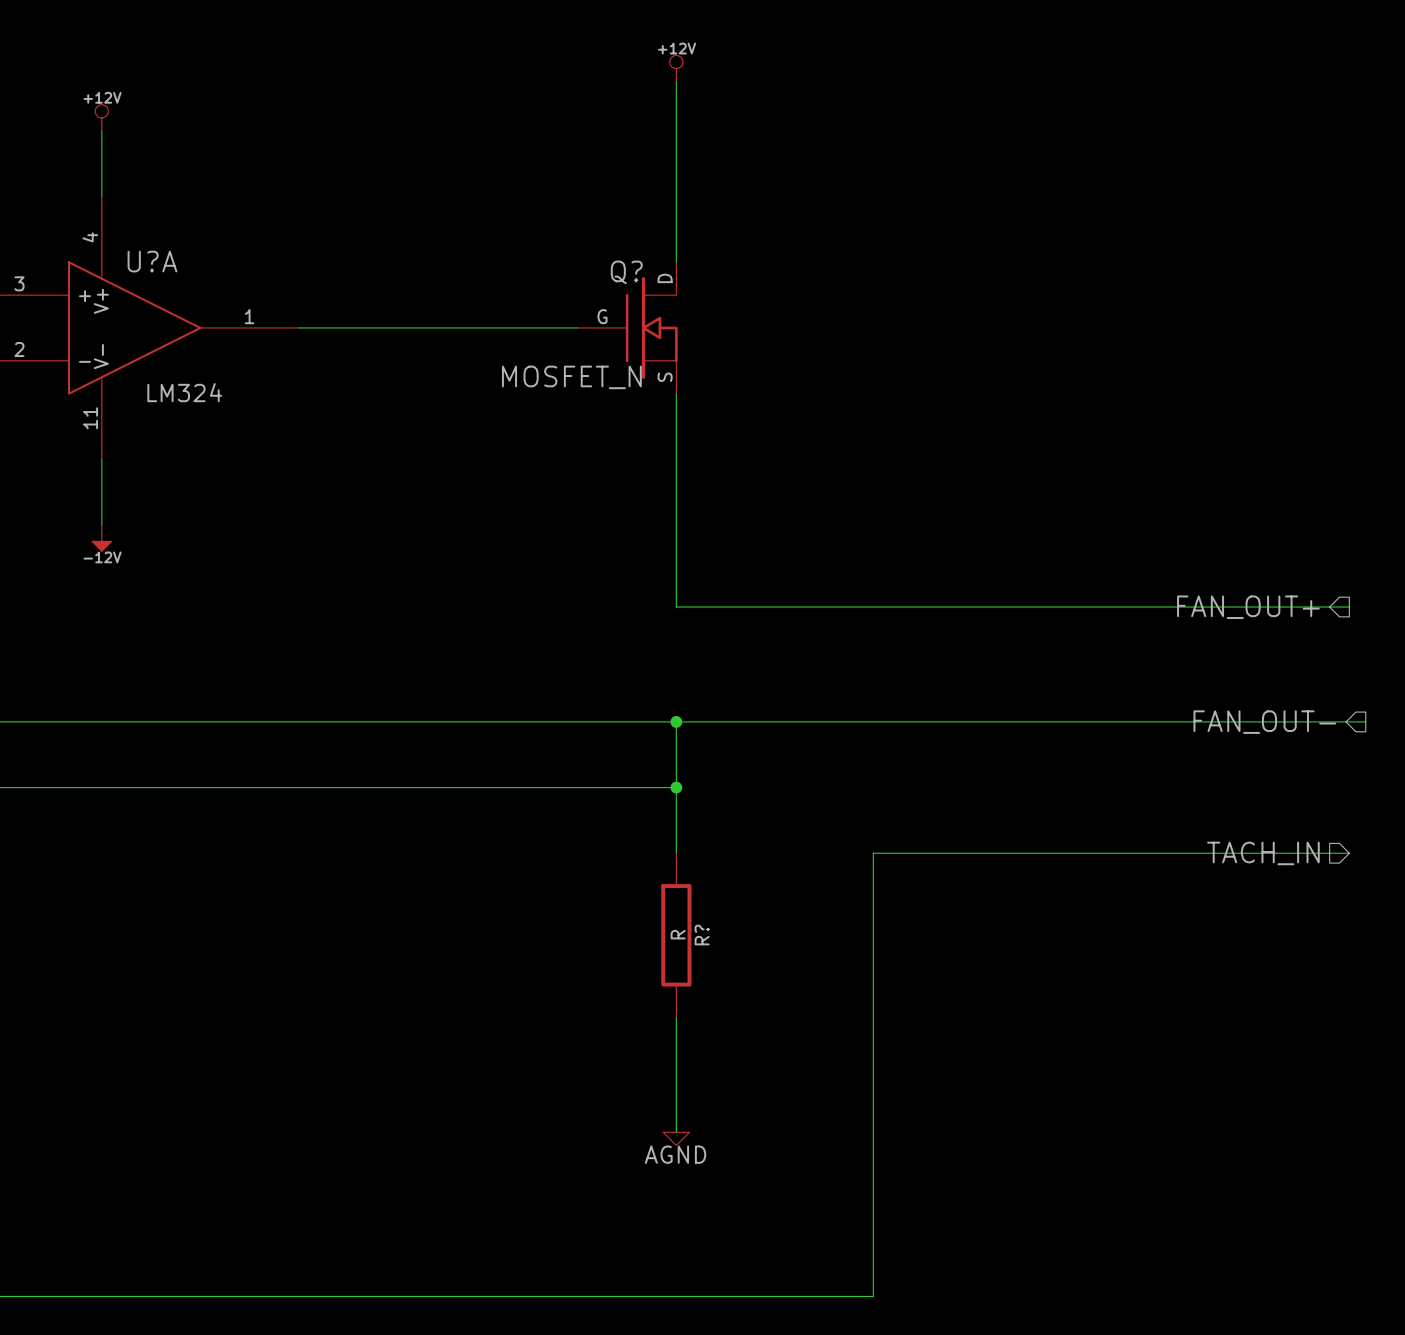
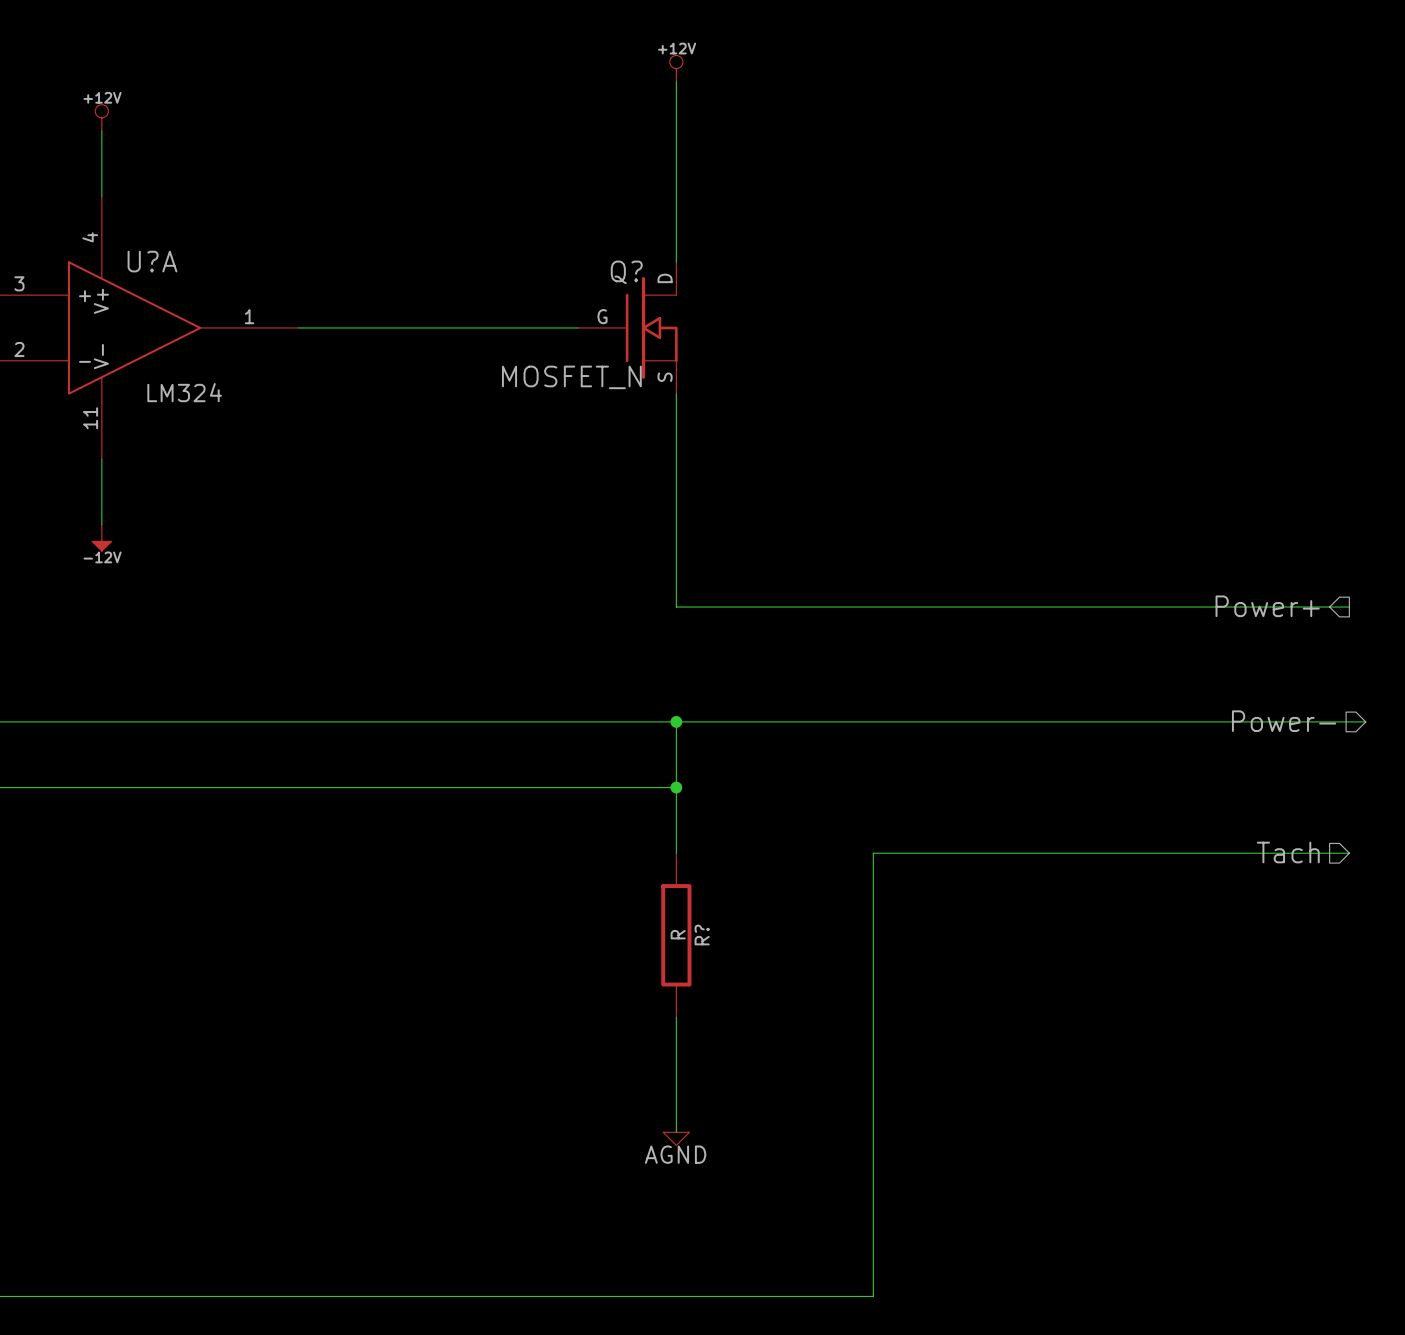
hierarchical label: FAN_OUT+ (1248, 607) -> Power+ (1267, 606)
hierarchical label shape: output (1264, 722) -> input (1284, 721)
hierarchical label: FAN_OUT- (1264, 722) -> Power- (1284, 721)
hierarchical label: TACH_IN (1263, 853) -> Tach (1288, 852)

